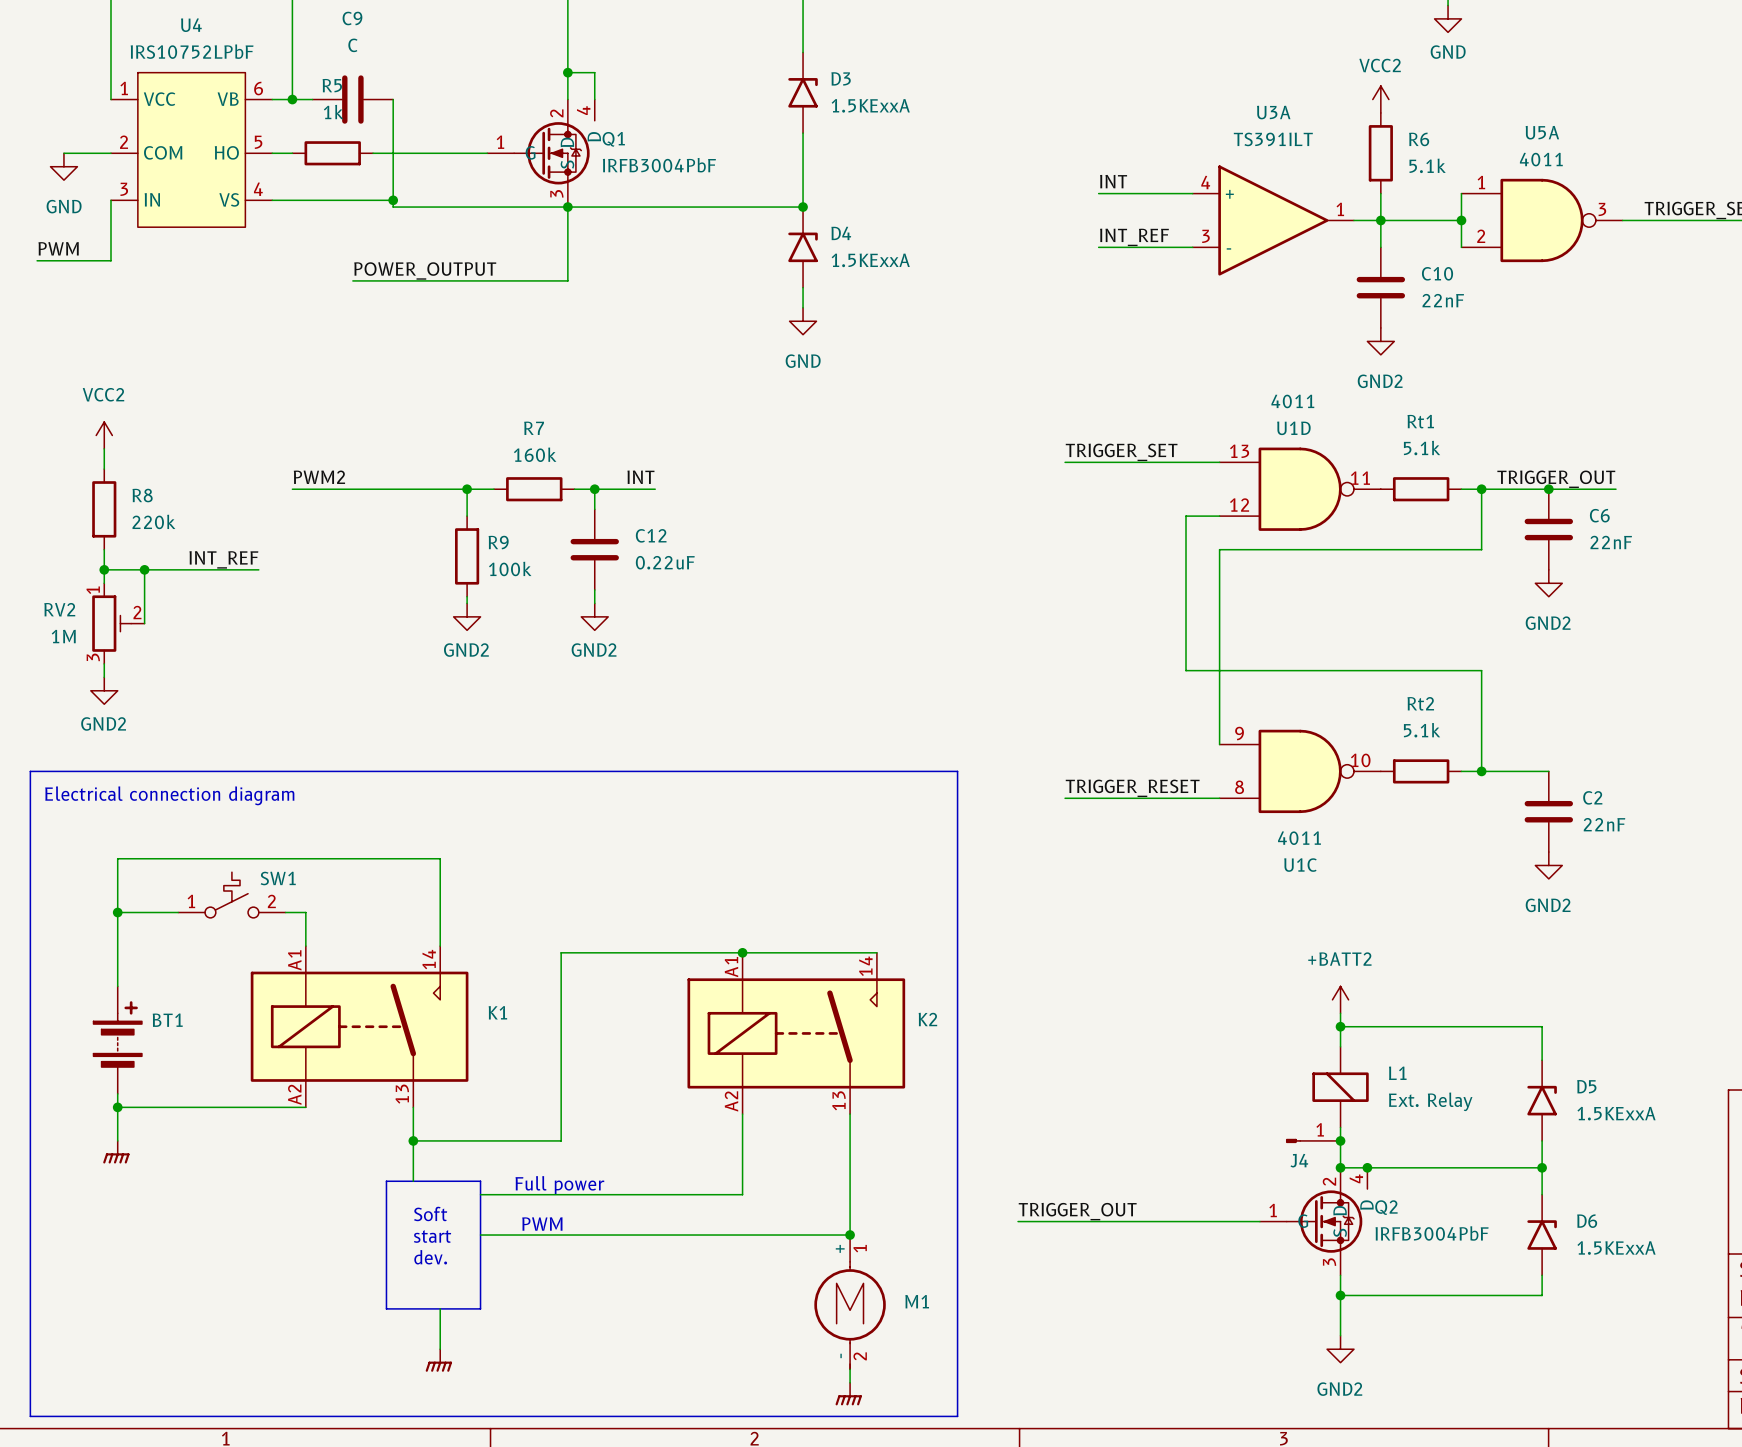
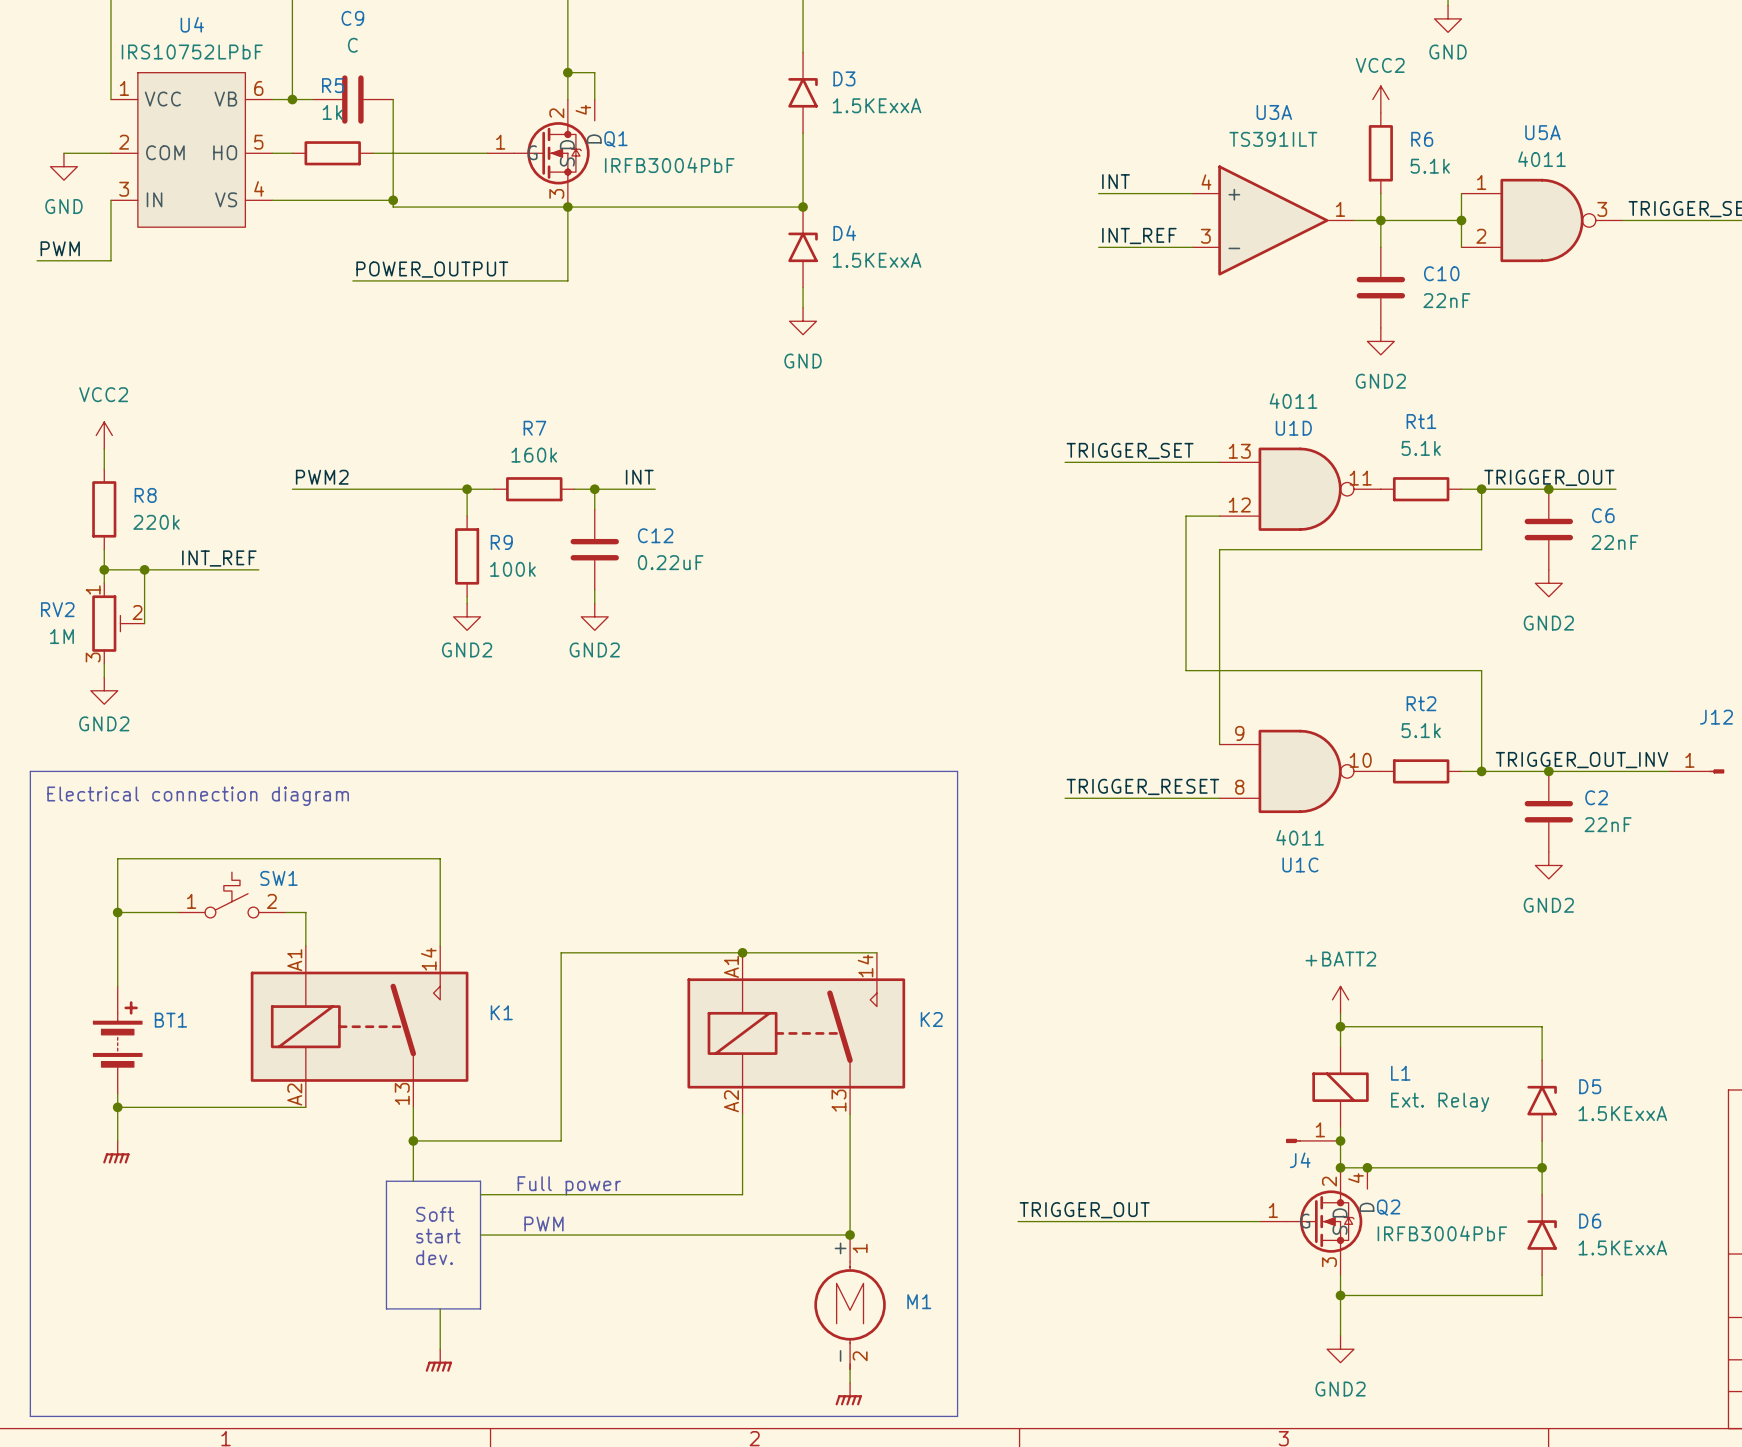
label: none -> TRIGGER_OUT_INV (1581, 760)
wire: none -> (1548, 771) (1669, 771)
junction: none -> (1548, 771)
J12: none -> (1697, 771)

